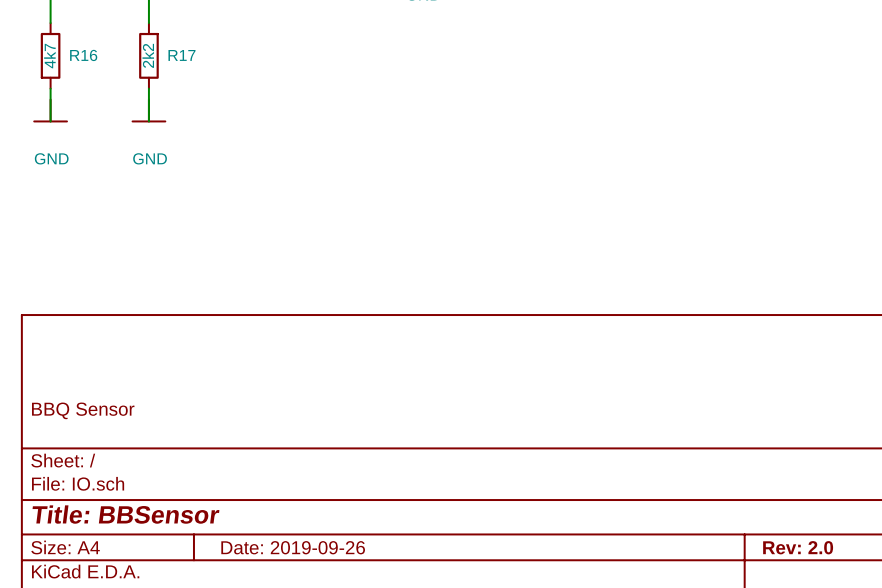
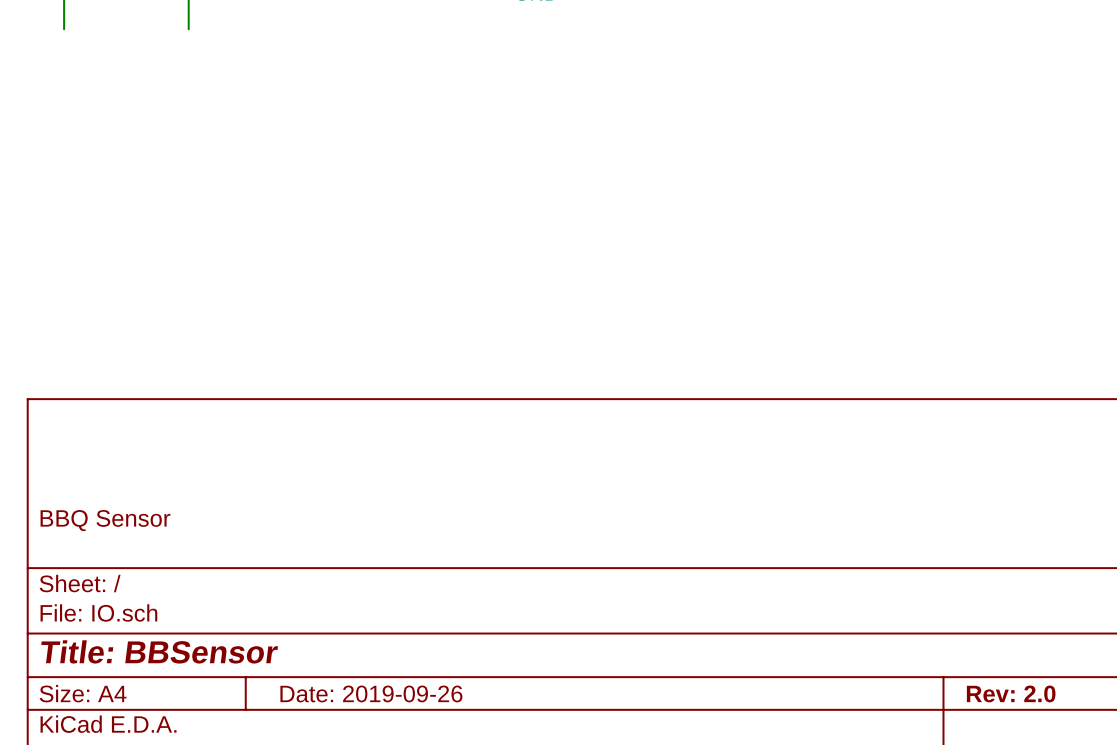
R16: 4k7 (50, 55) -> none
R17: 2k2 (148, 55) -> none
wire: (50, 88) (50, 121) -> none
wire: (148, 88) (148, 121) -> none
power symbol: GND (50, 110) -> none
power symbol: GND (148, 110) -> none

